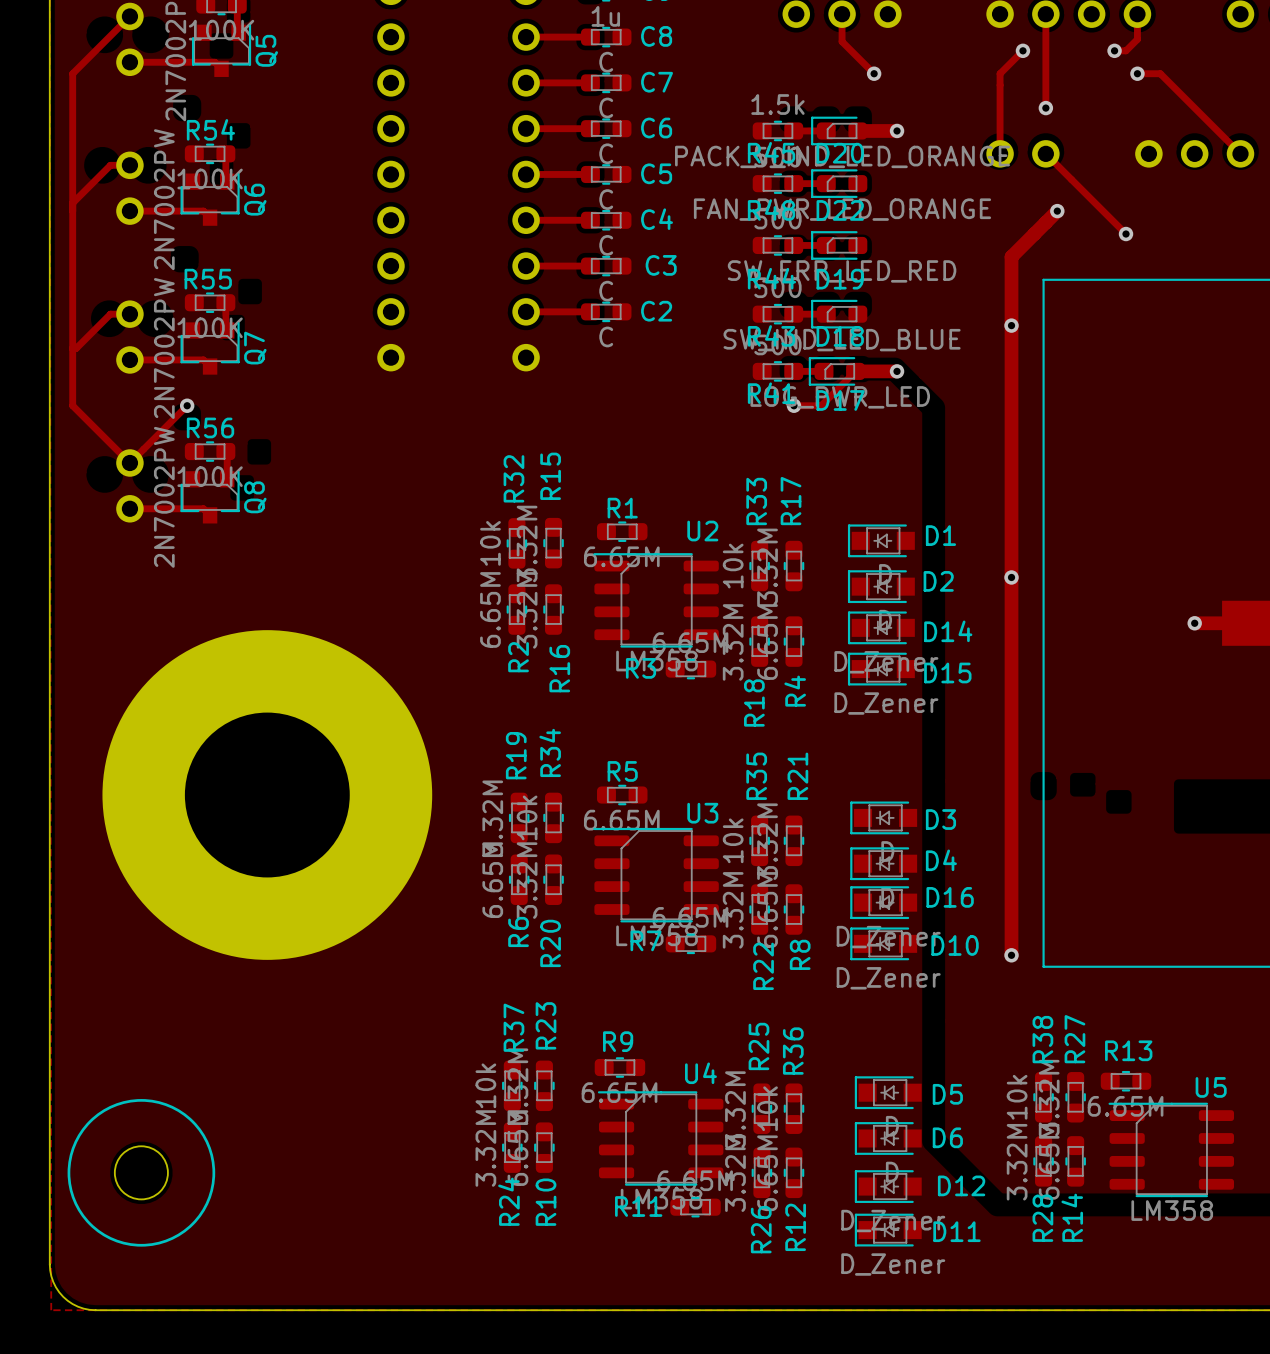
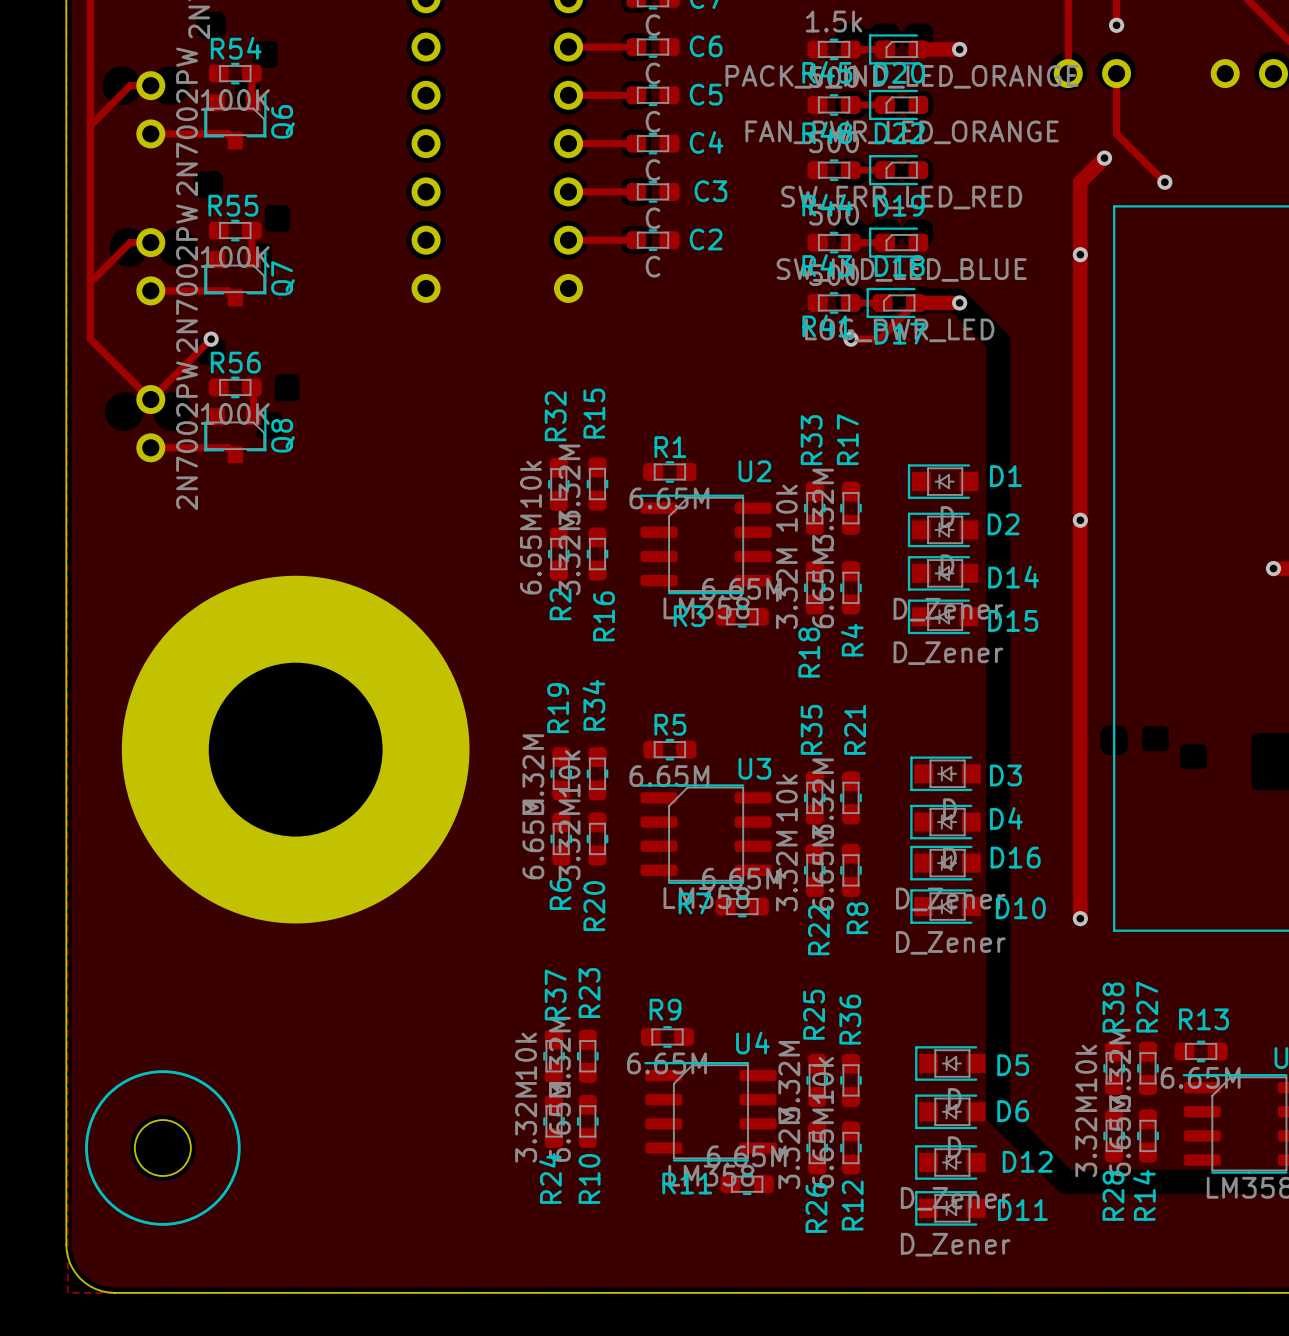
track: (1045, 153) (1126, 234) -> (1116, 73) (1116, 133) (1164, 182)
track: (1057, 211) (1034, 234) -> none
via: (1057, 211) -> none
via: none -> (1104, 158)
via: (1126, 234) -> none
via: none -> (1164, 182)

